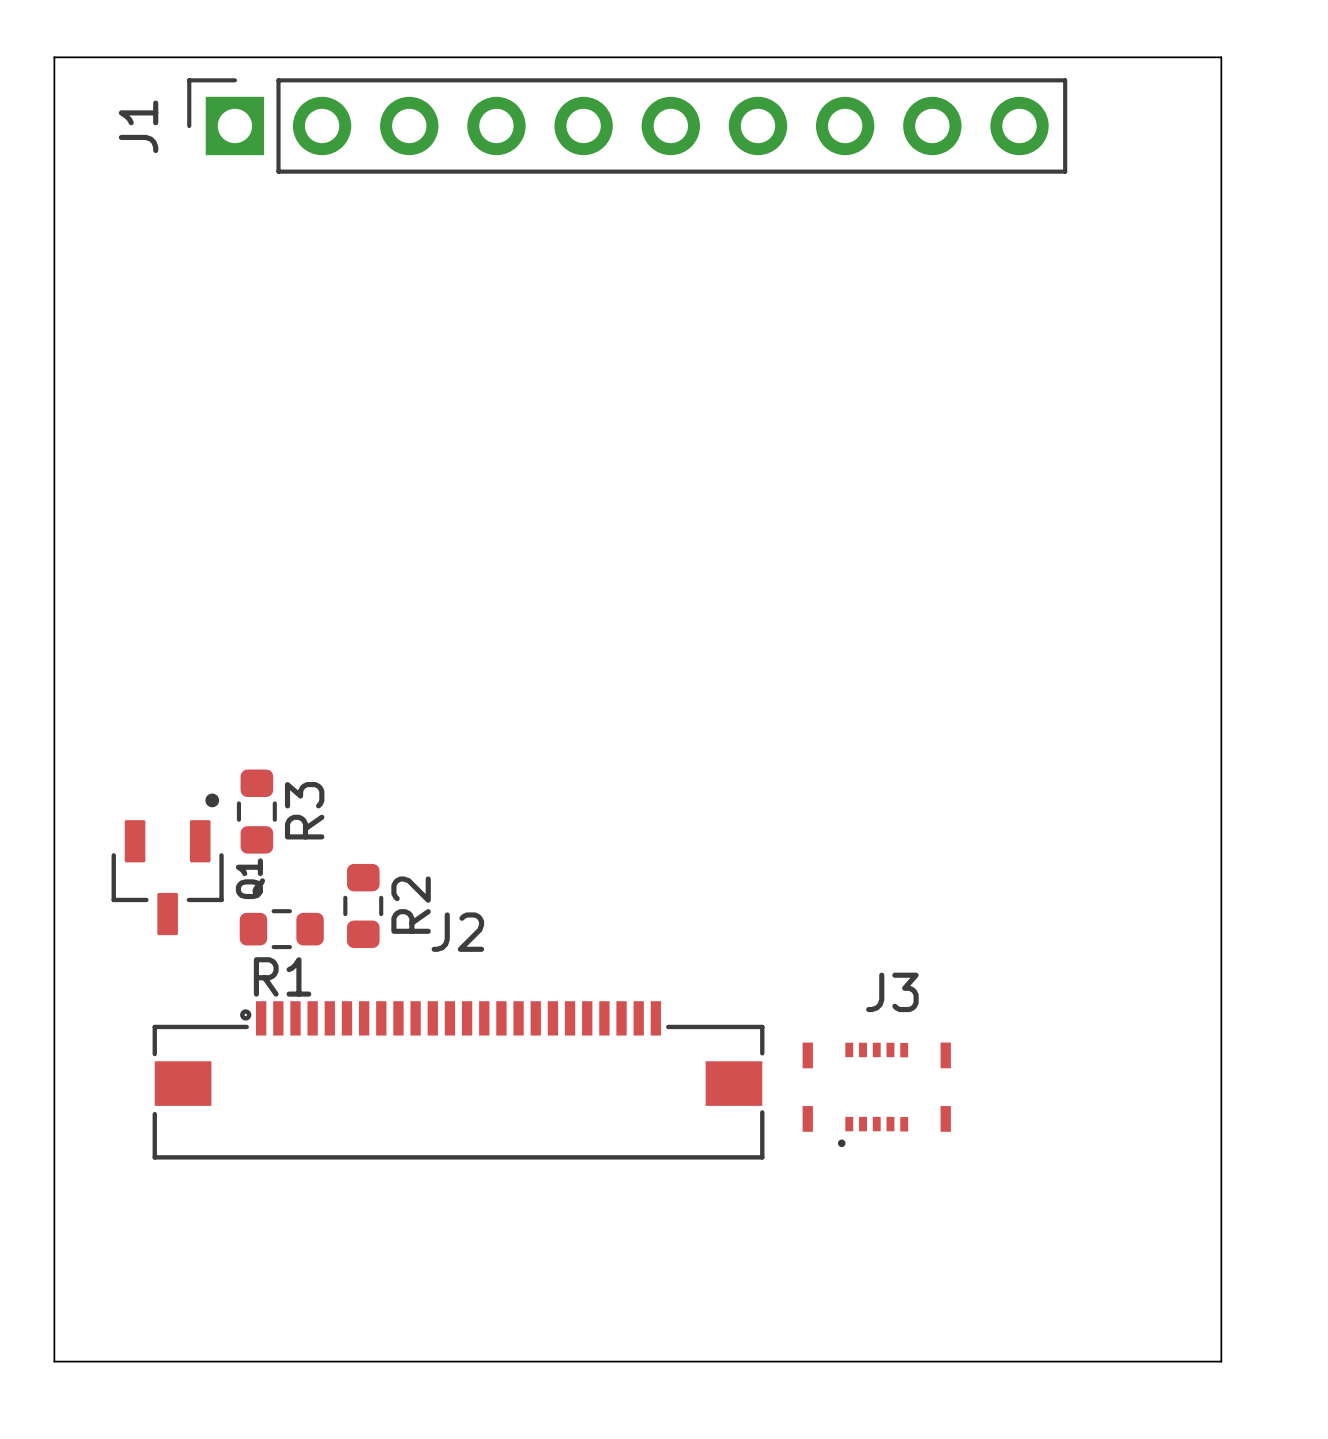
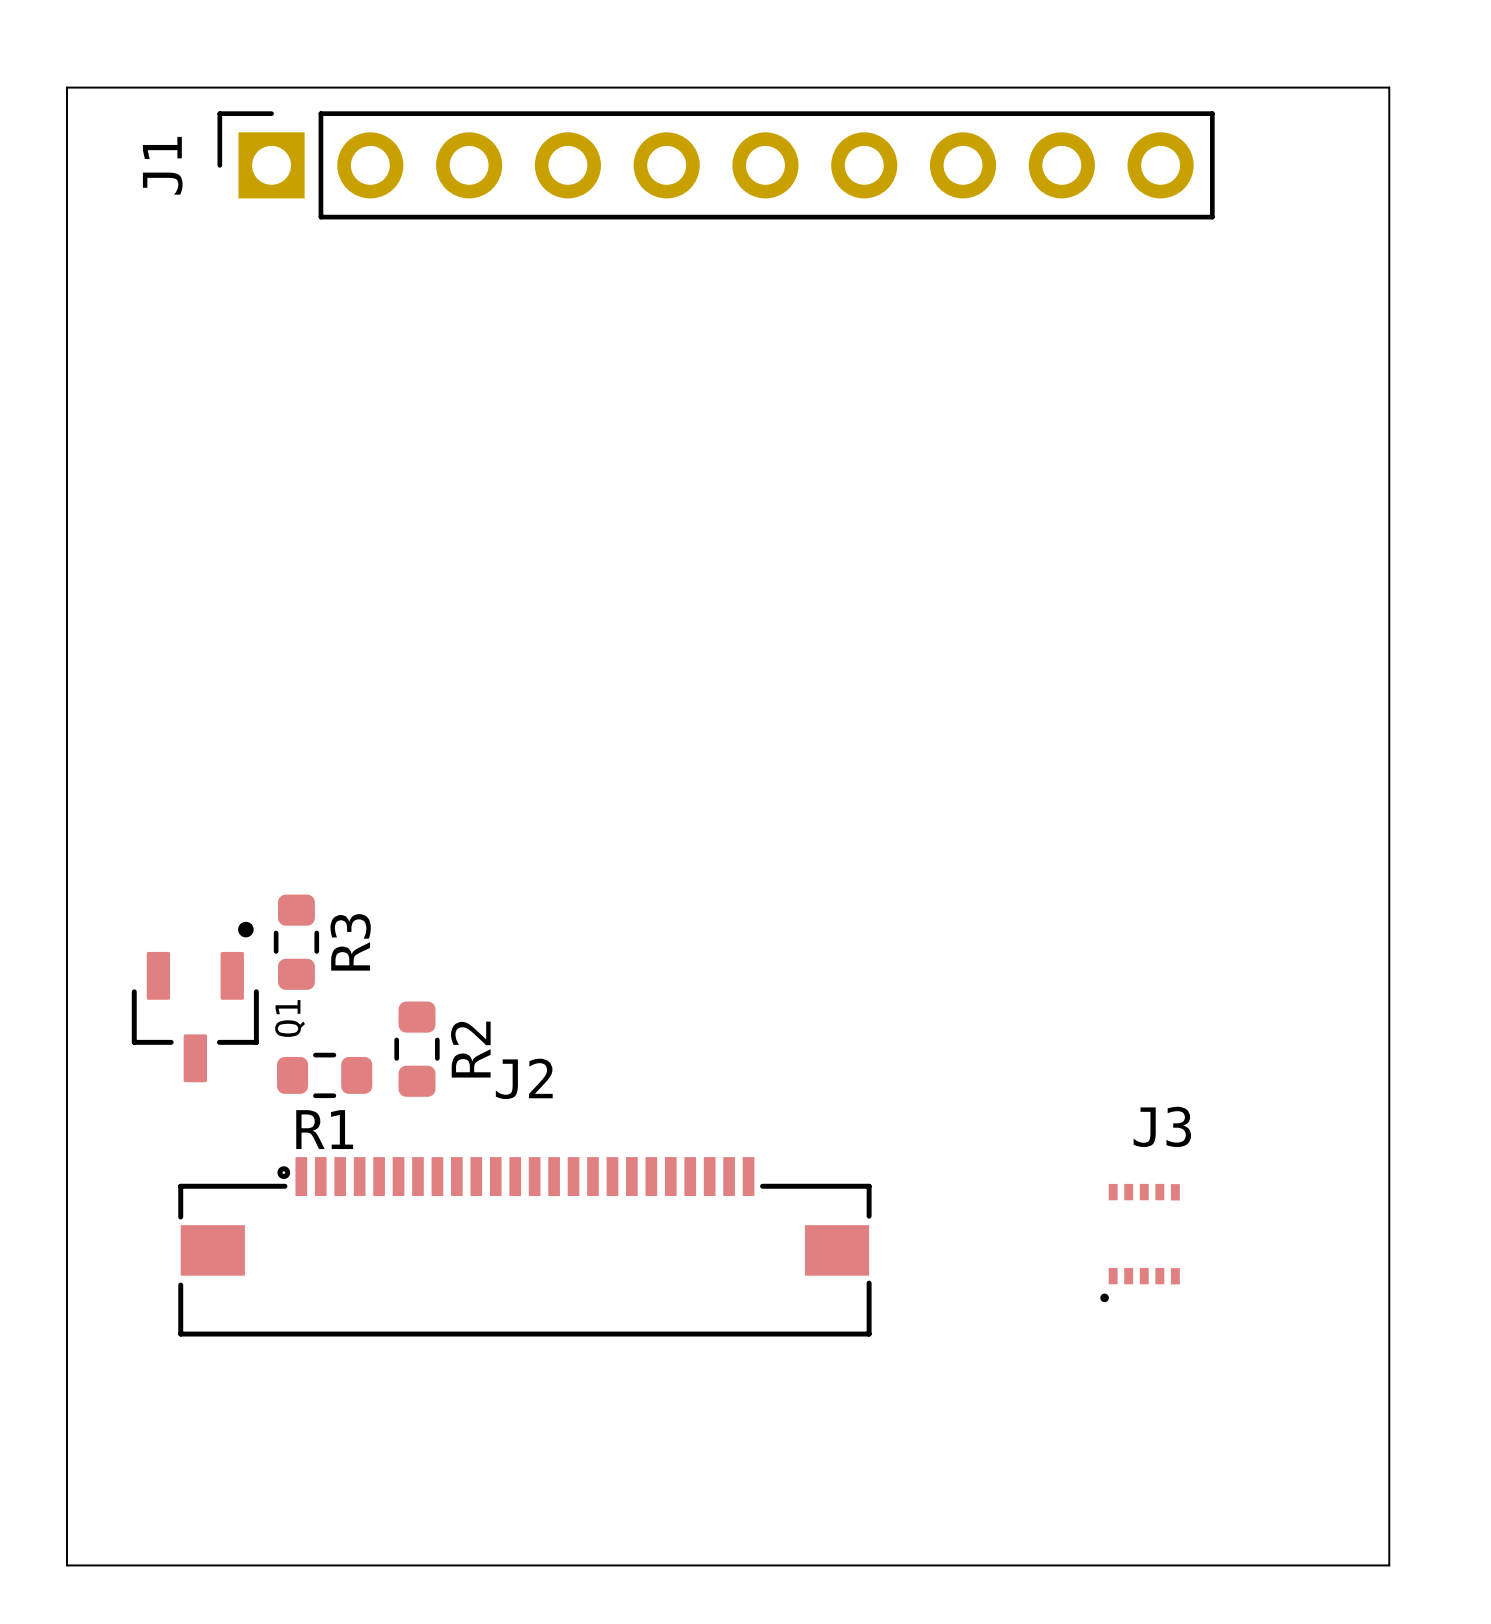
J3 footprint: [802, 1042, 951, 1148] -> [1100, 1183, 1180, 1303]

